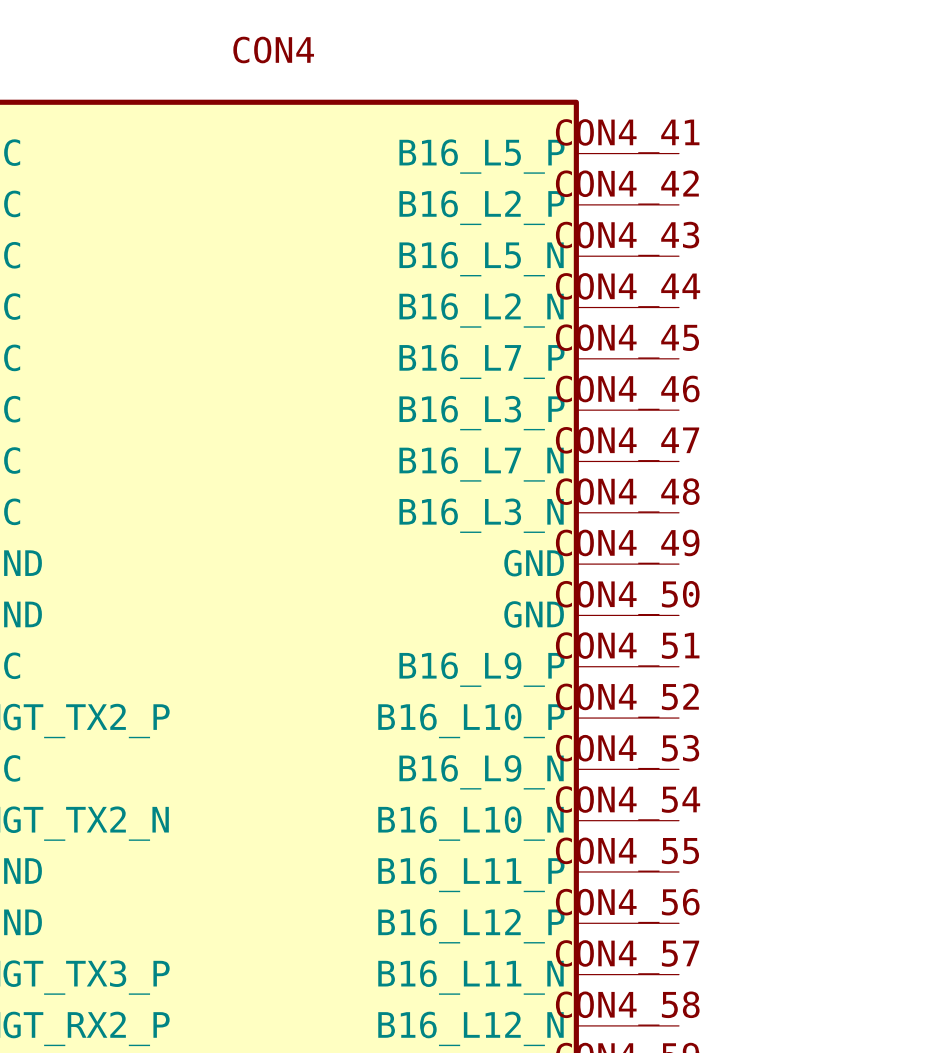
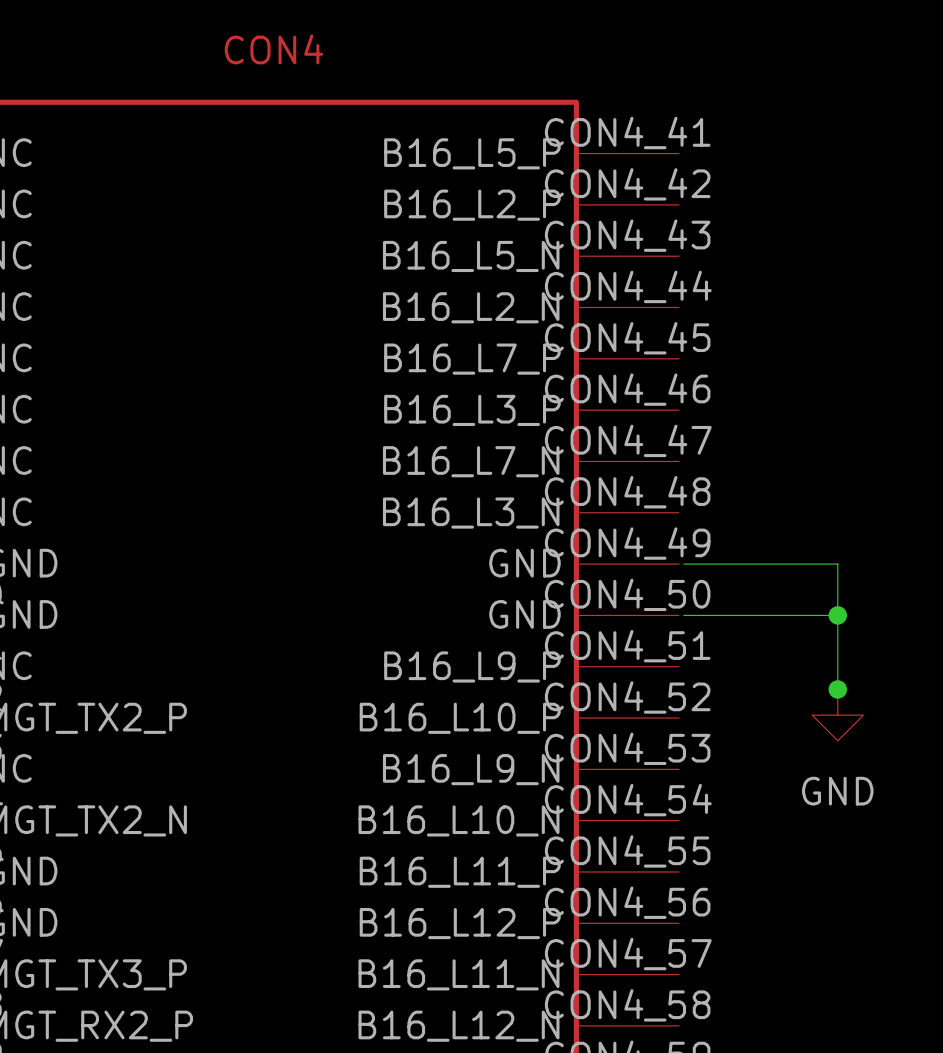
wire: none -> (683, 564) (837, 564) (837, 692)
wire: none -> (683, 615) (837, 615)
junction: none -> (837, 615)
junction: none -> (837, 689)
power symbol: none -> GND (837, 715)

